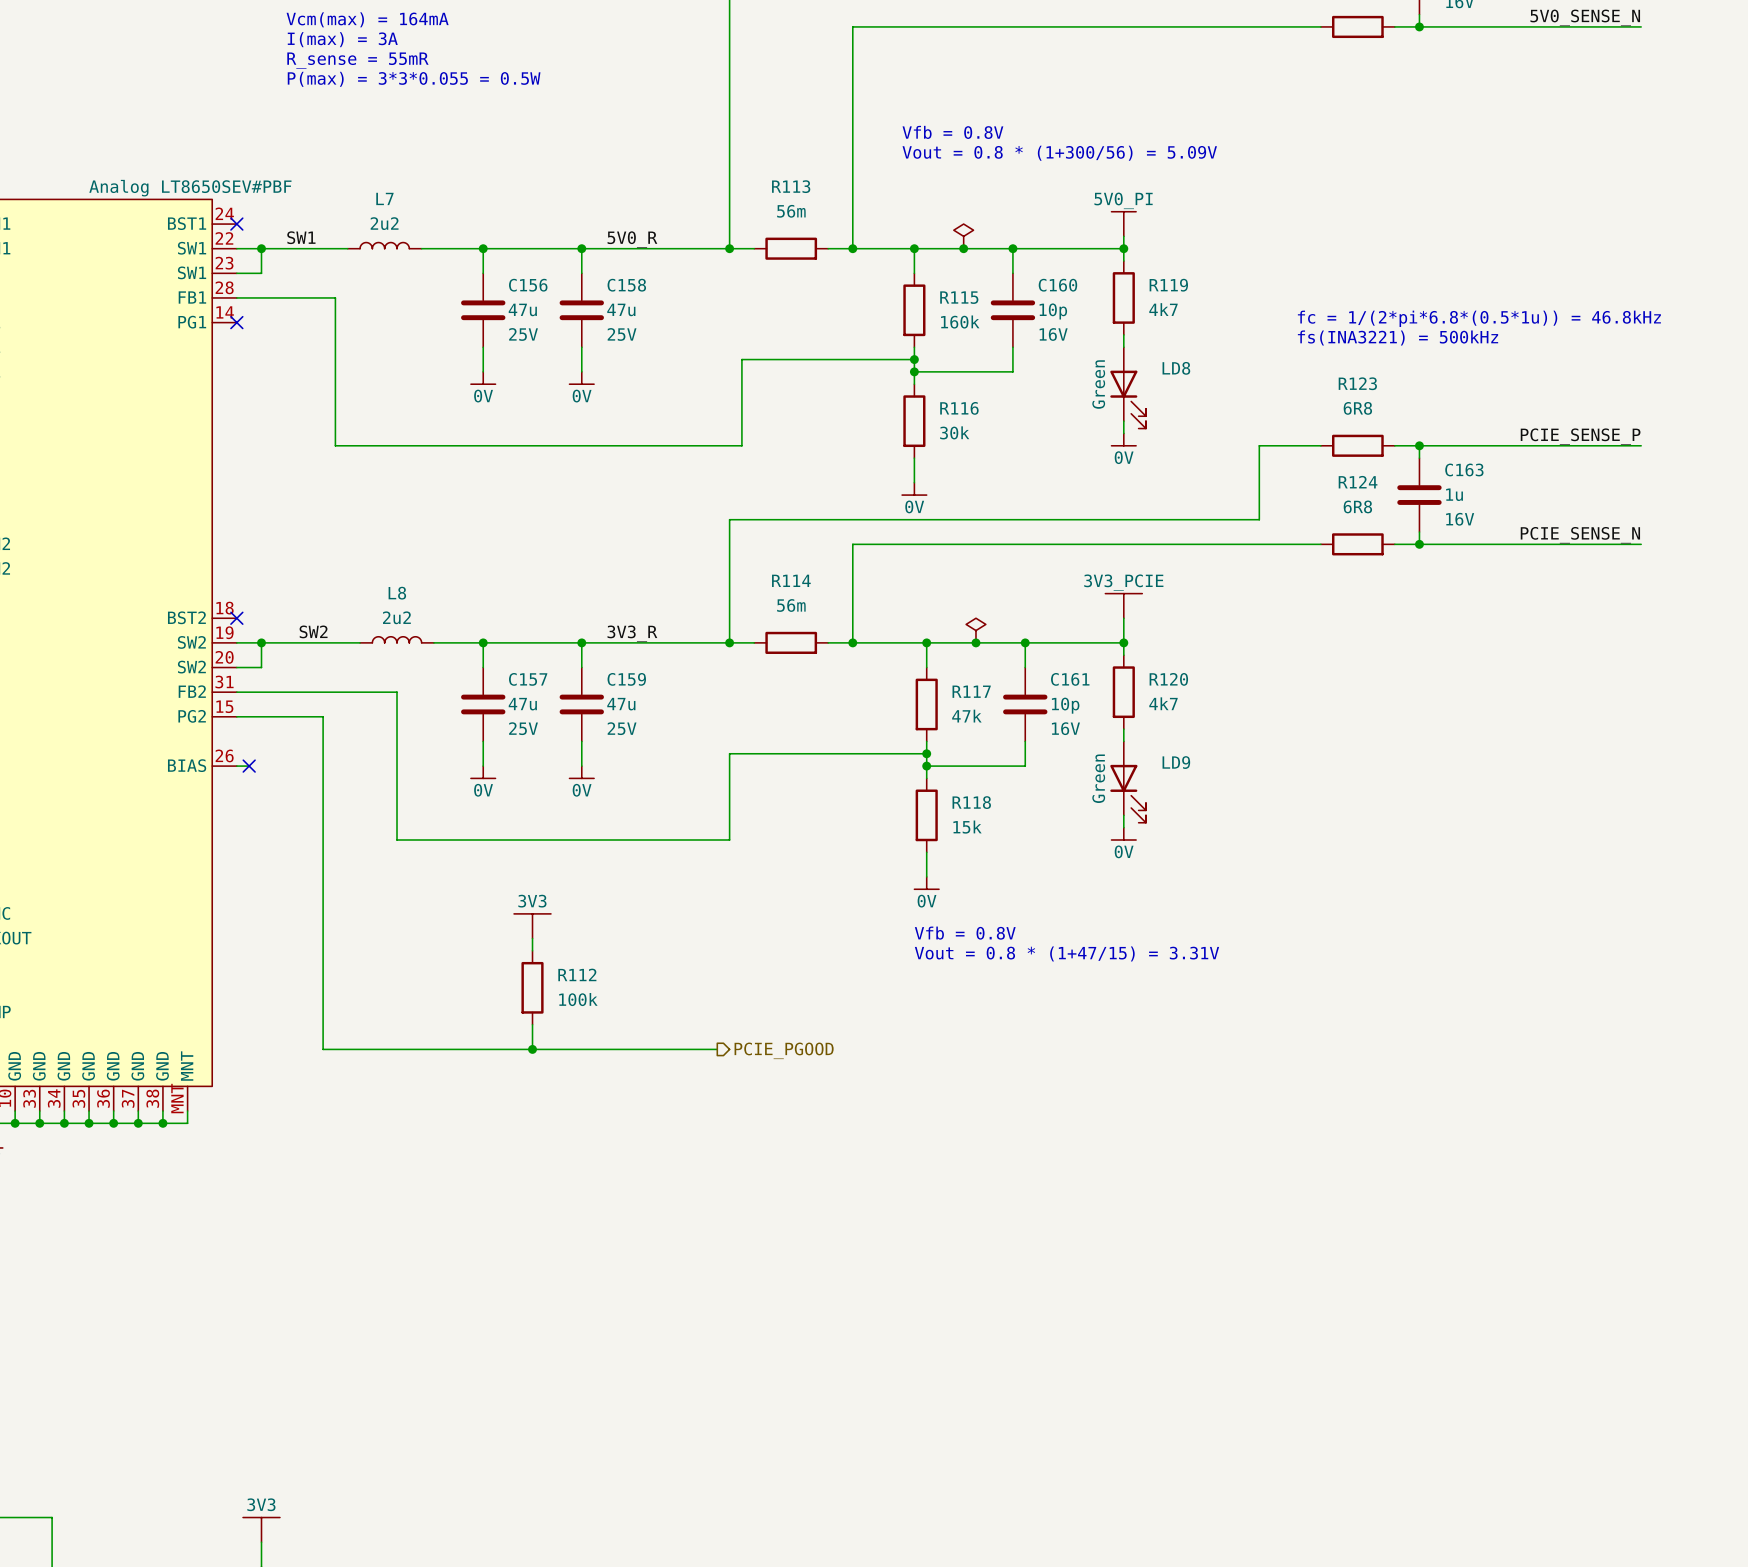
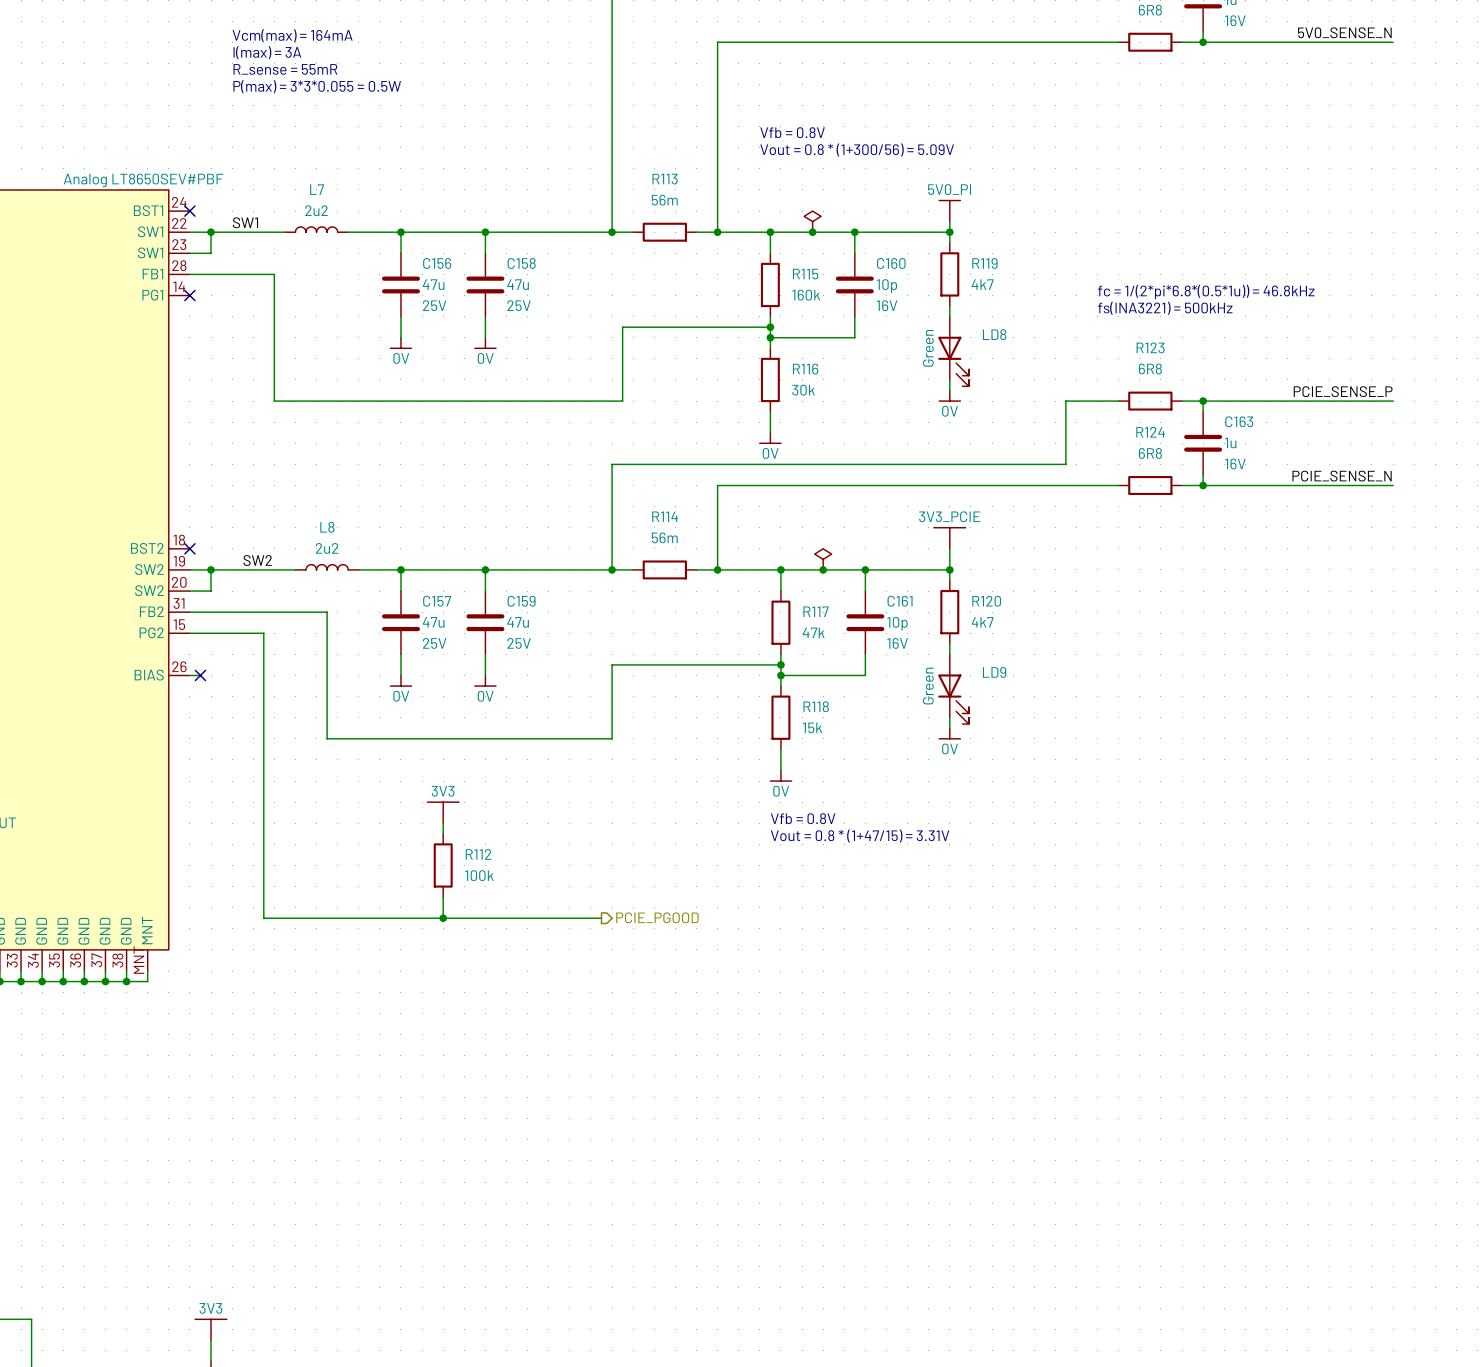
label: 5V0_R (632, 239) -> none
label: 3V3_R (632, 633) -> none

